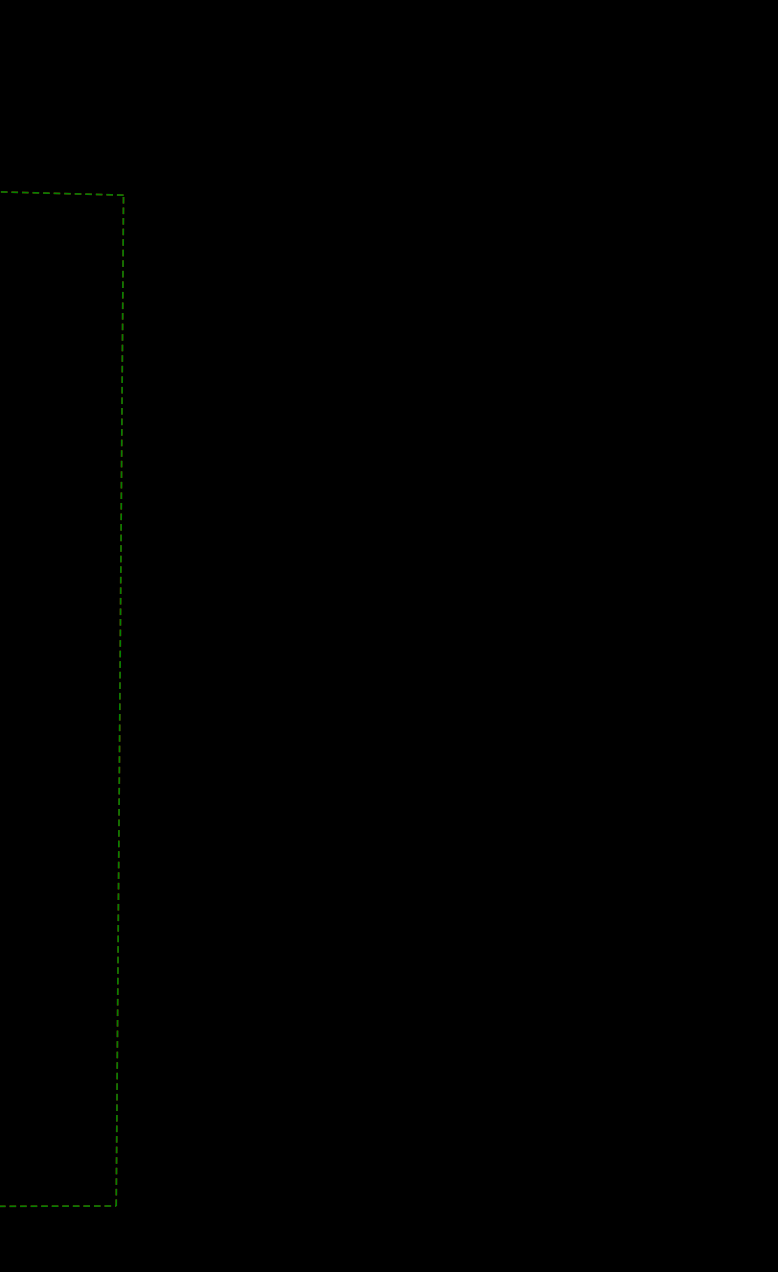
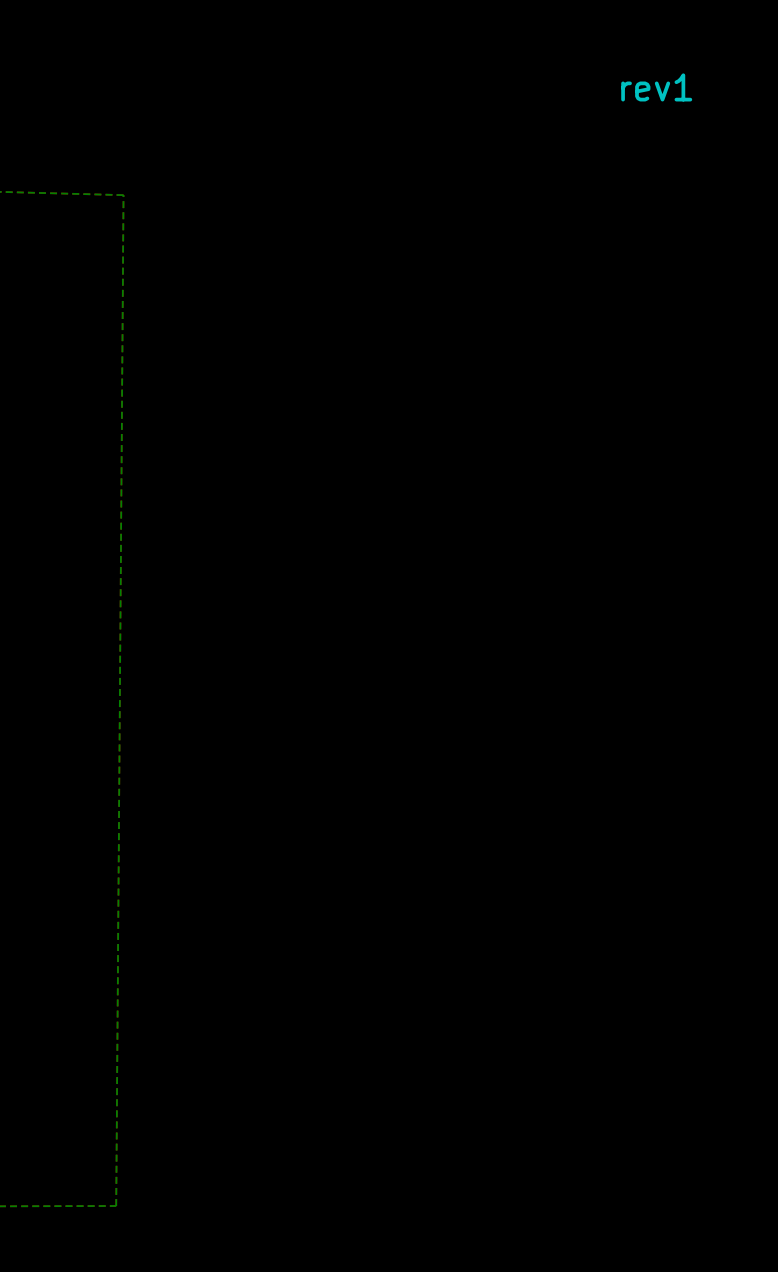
text: none -> rev1 (656, 87)

